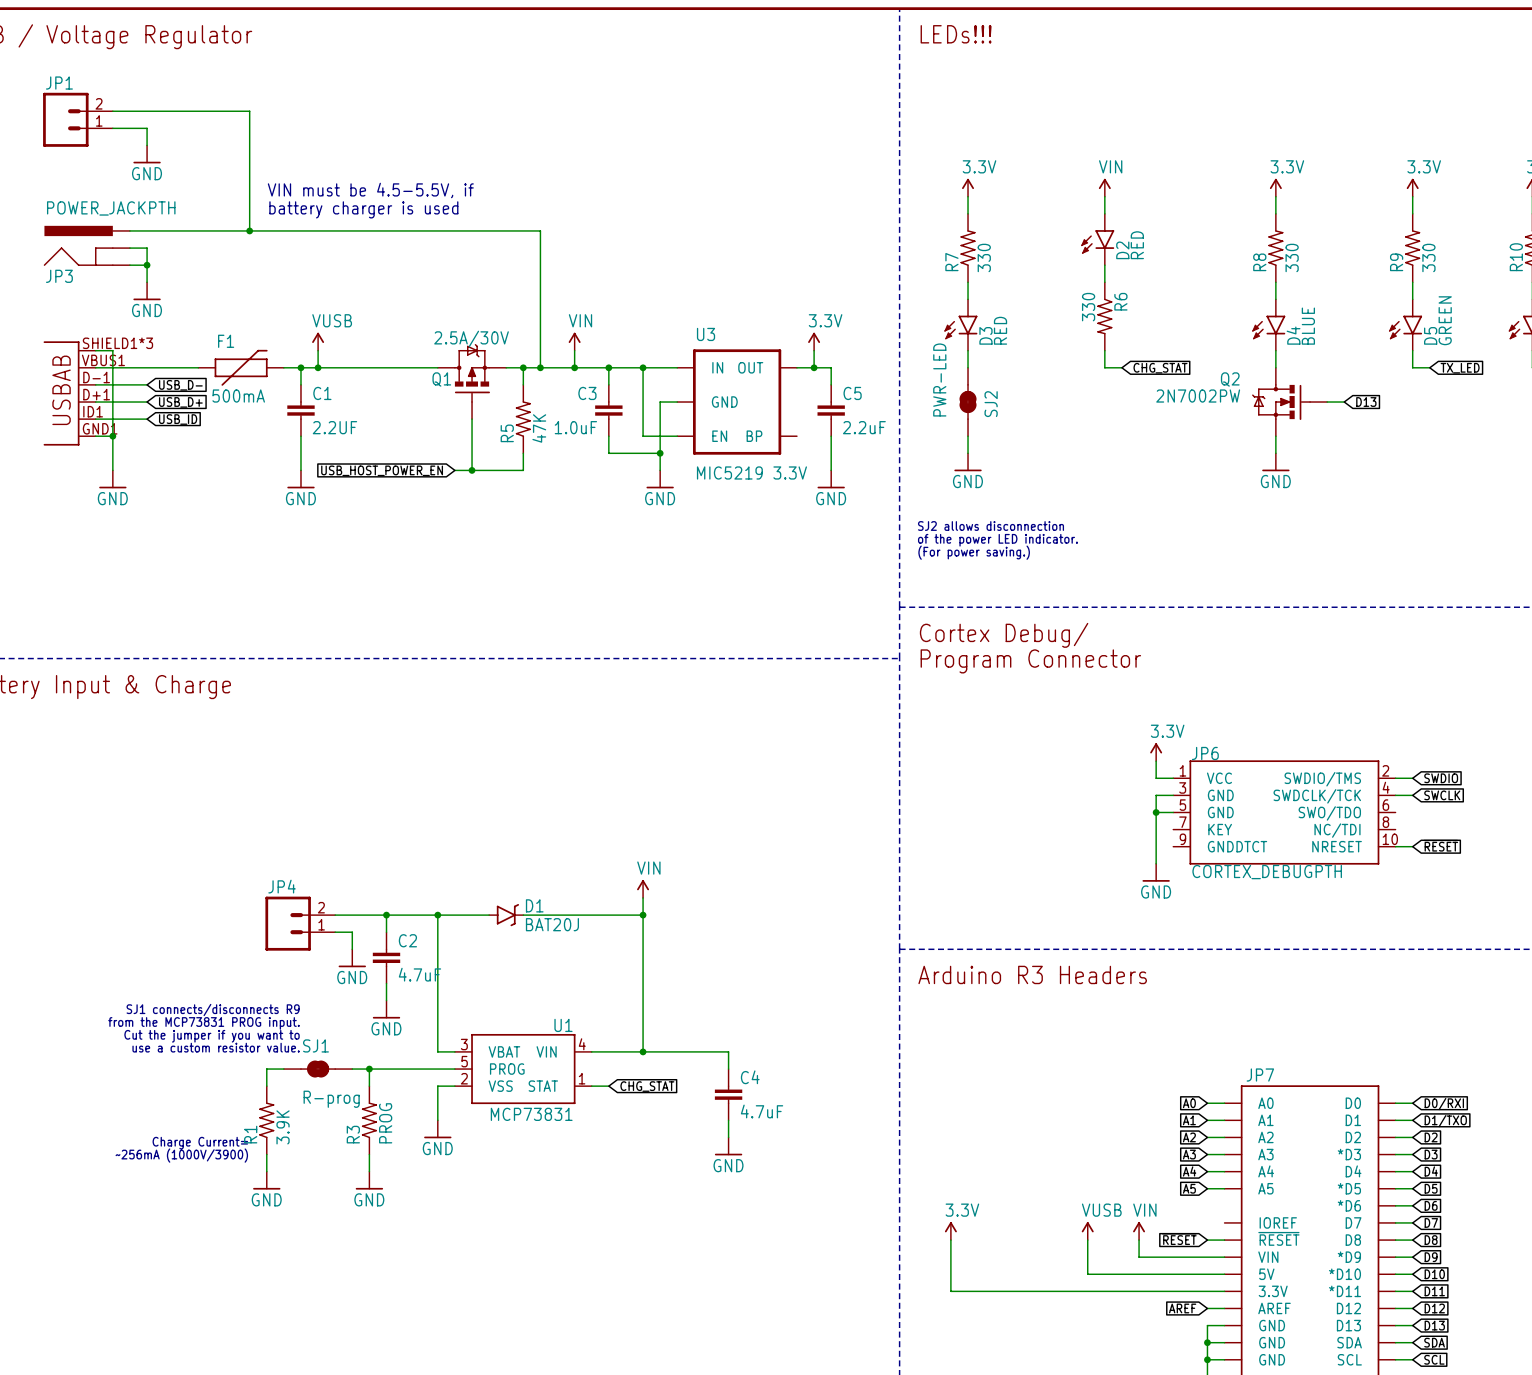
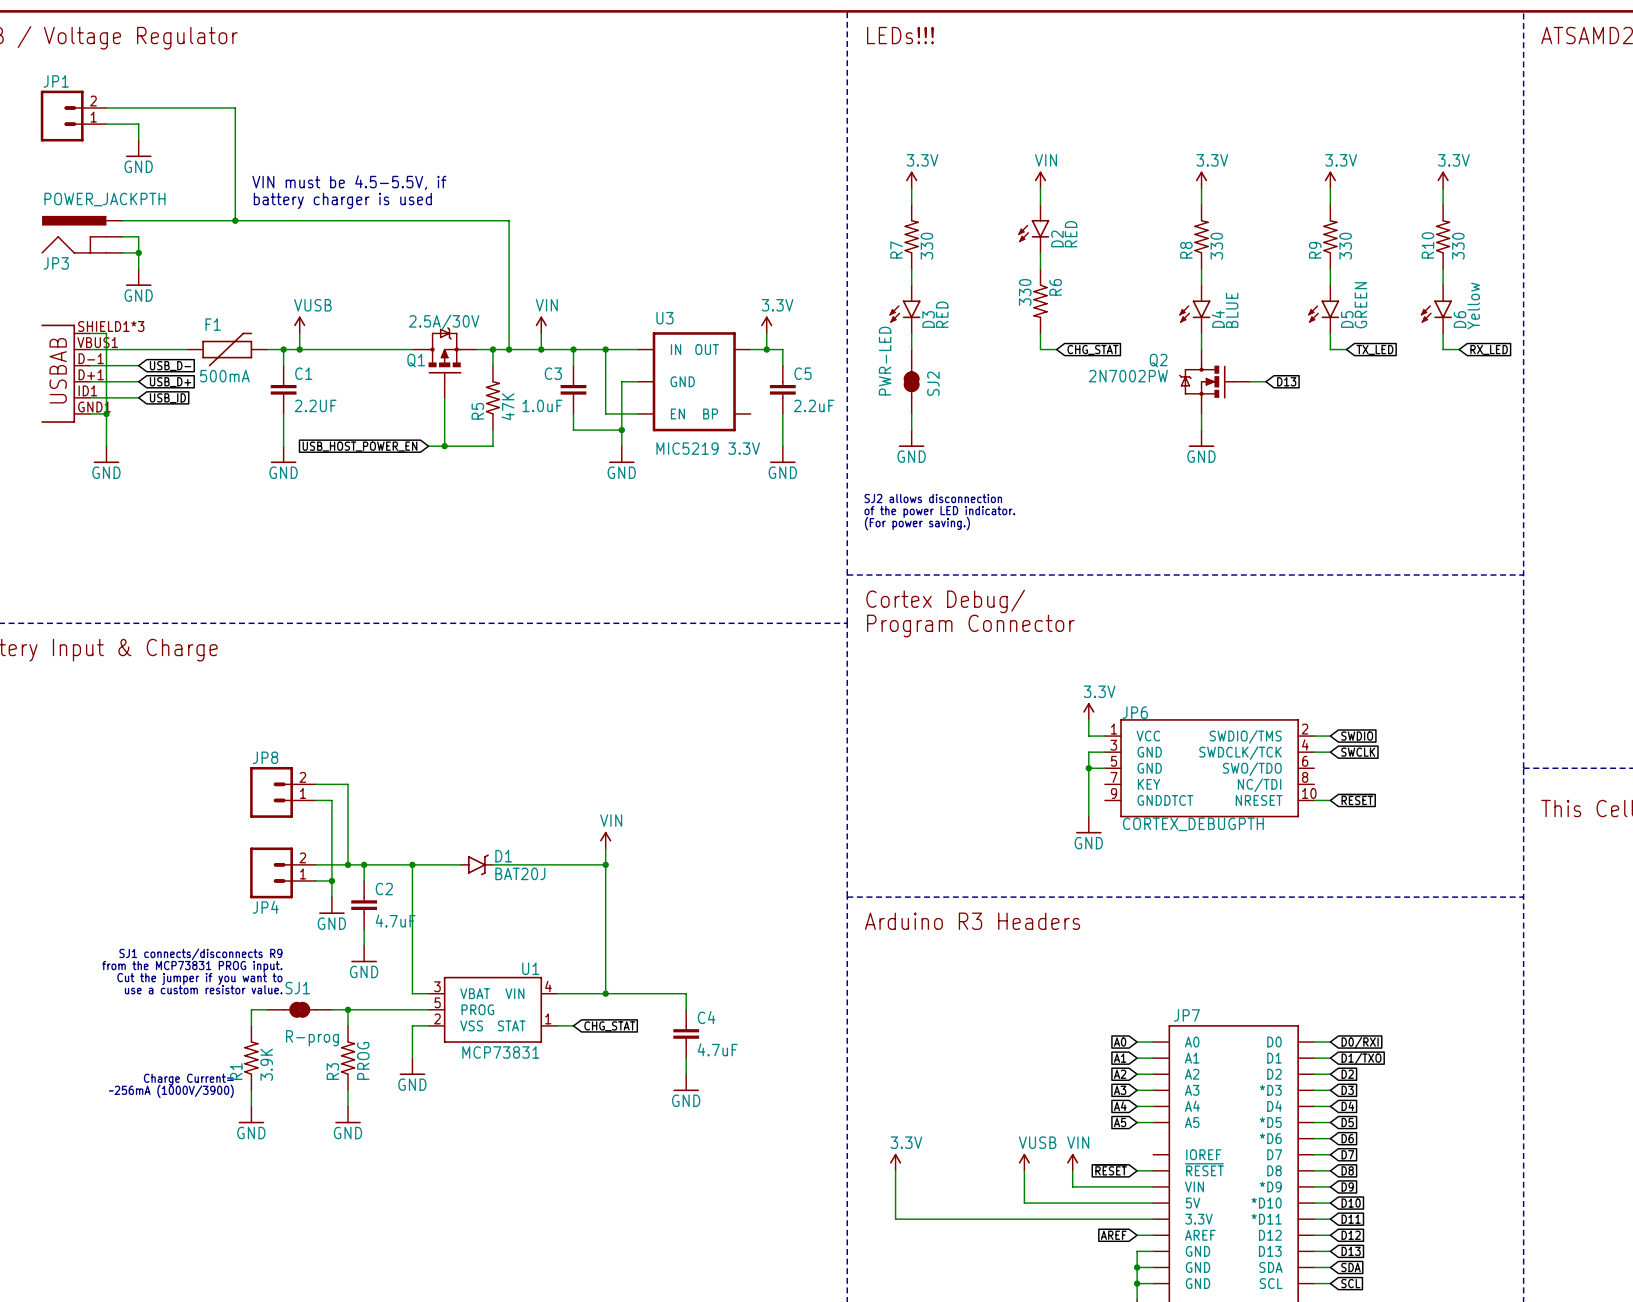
wire: none -> (315, 784) (348, 784) (348, 864)
JP8: none -> (282, 792)
wire: none -> (315, 800) (331, 800) (331, 880)
JP4 name position: JP4 (282, 886) -> JP4 (265, 907)
junction: none -> (348, 864)
junction: none -> (331, 880)

